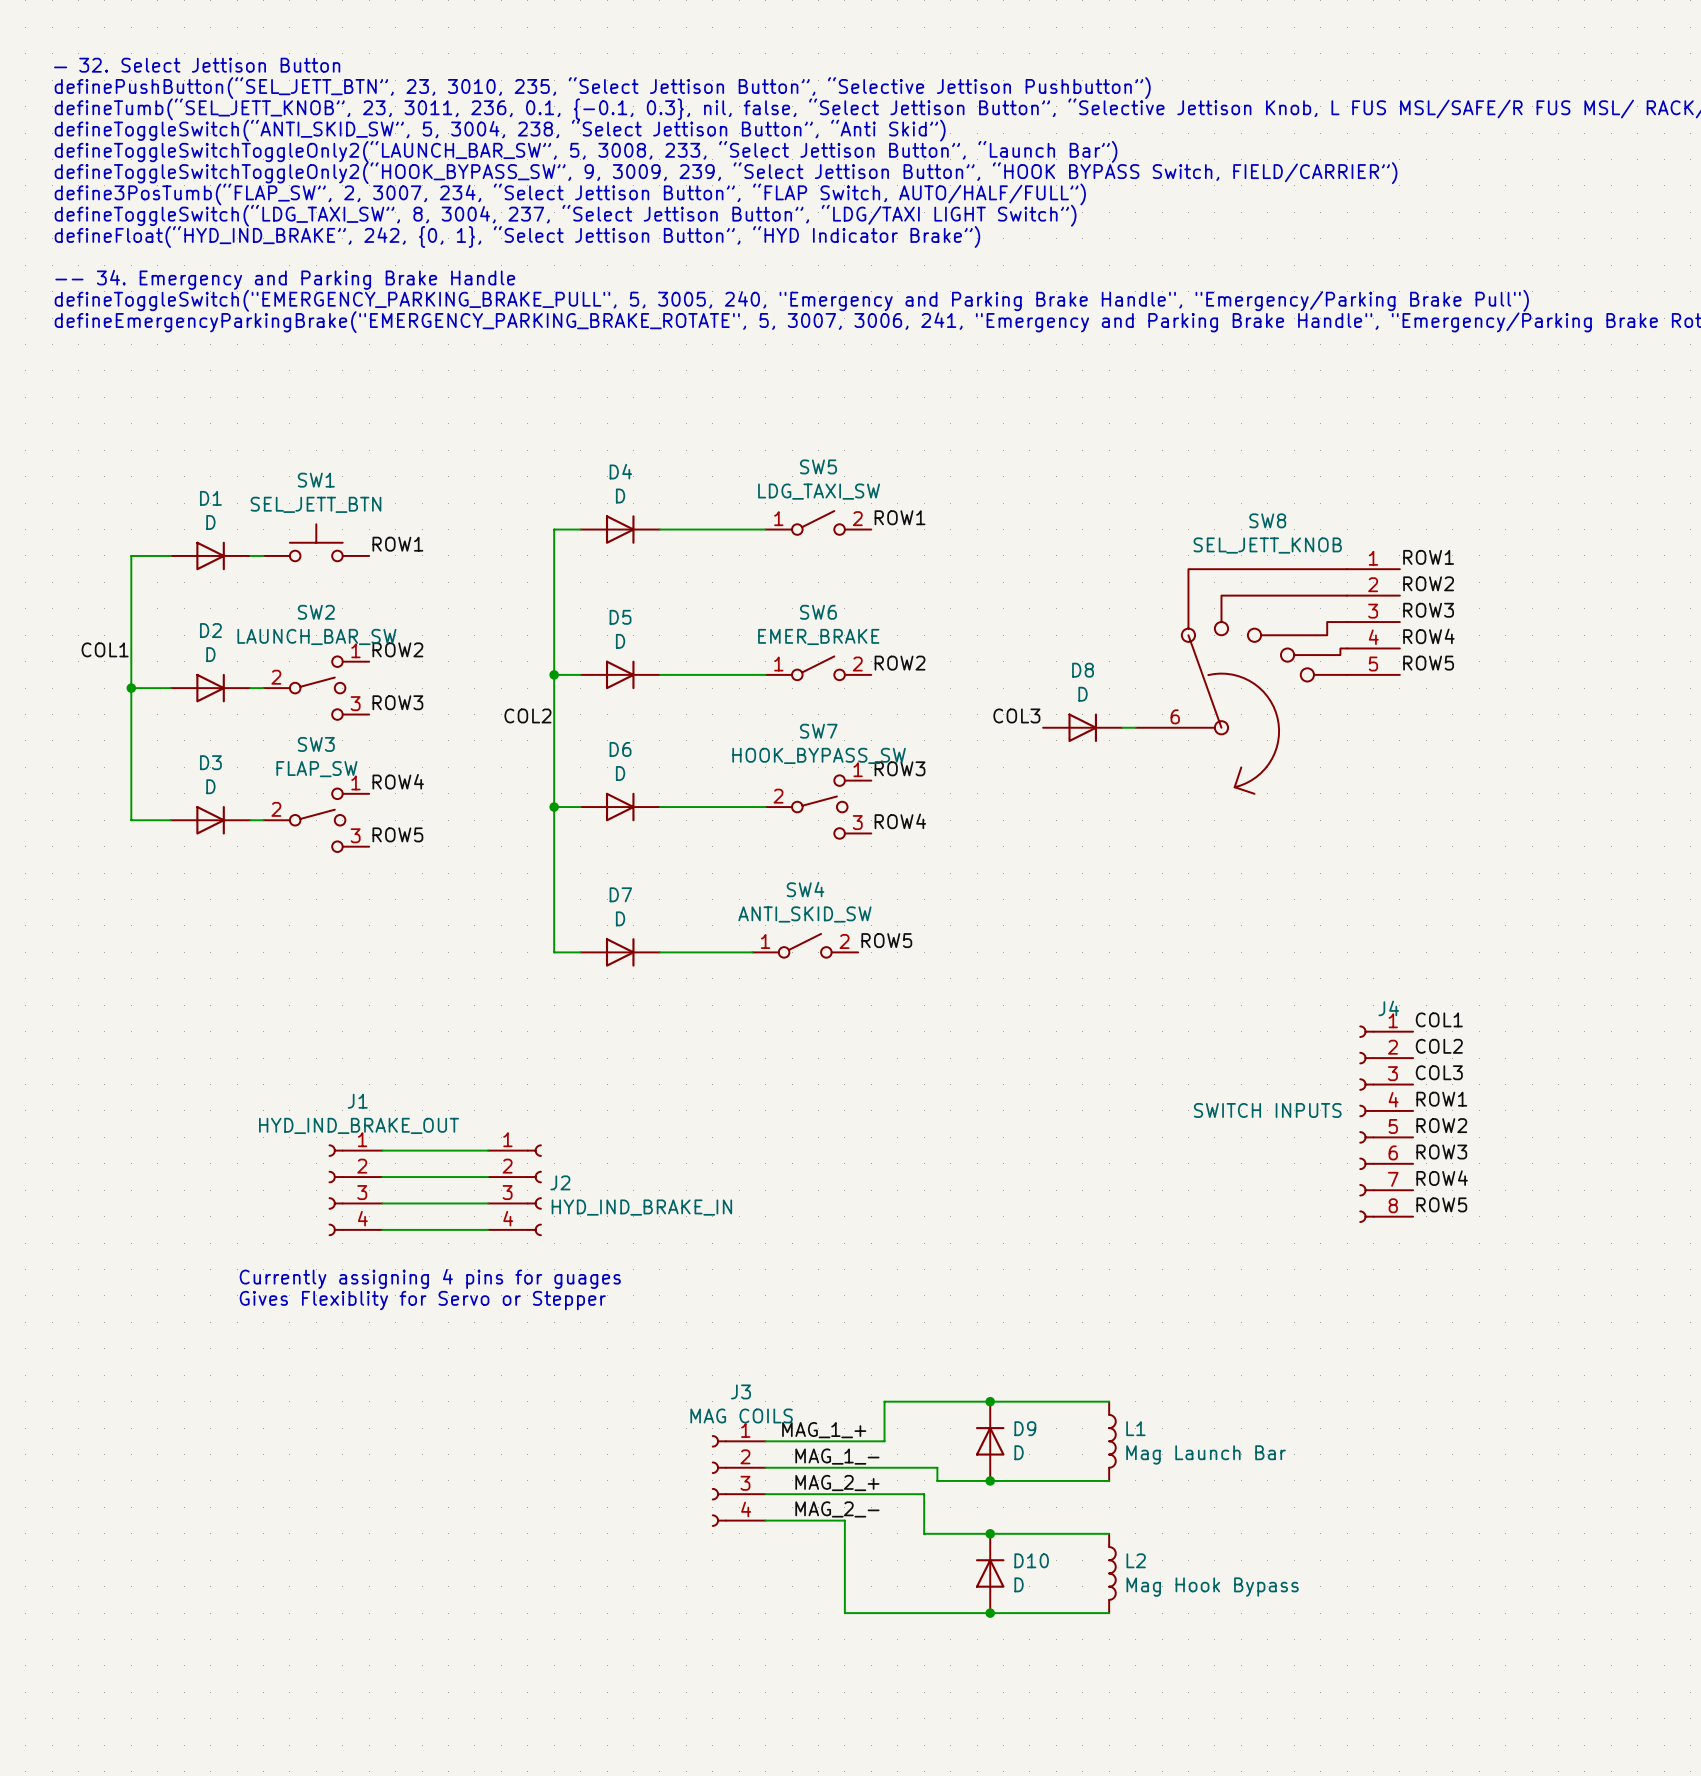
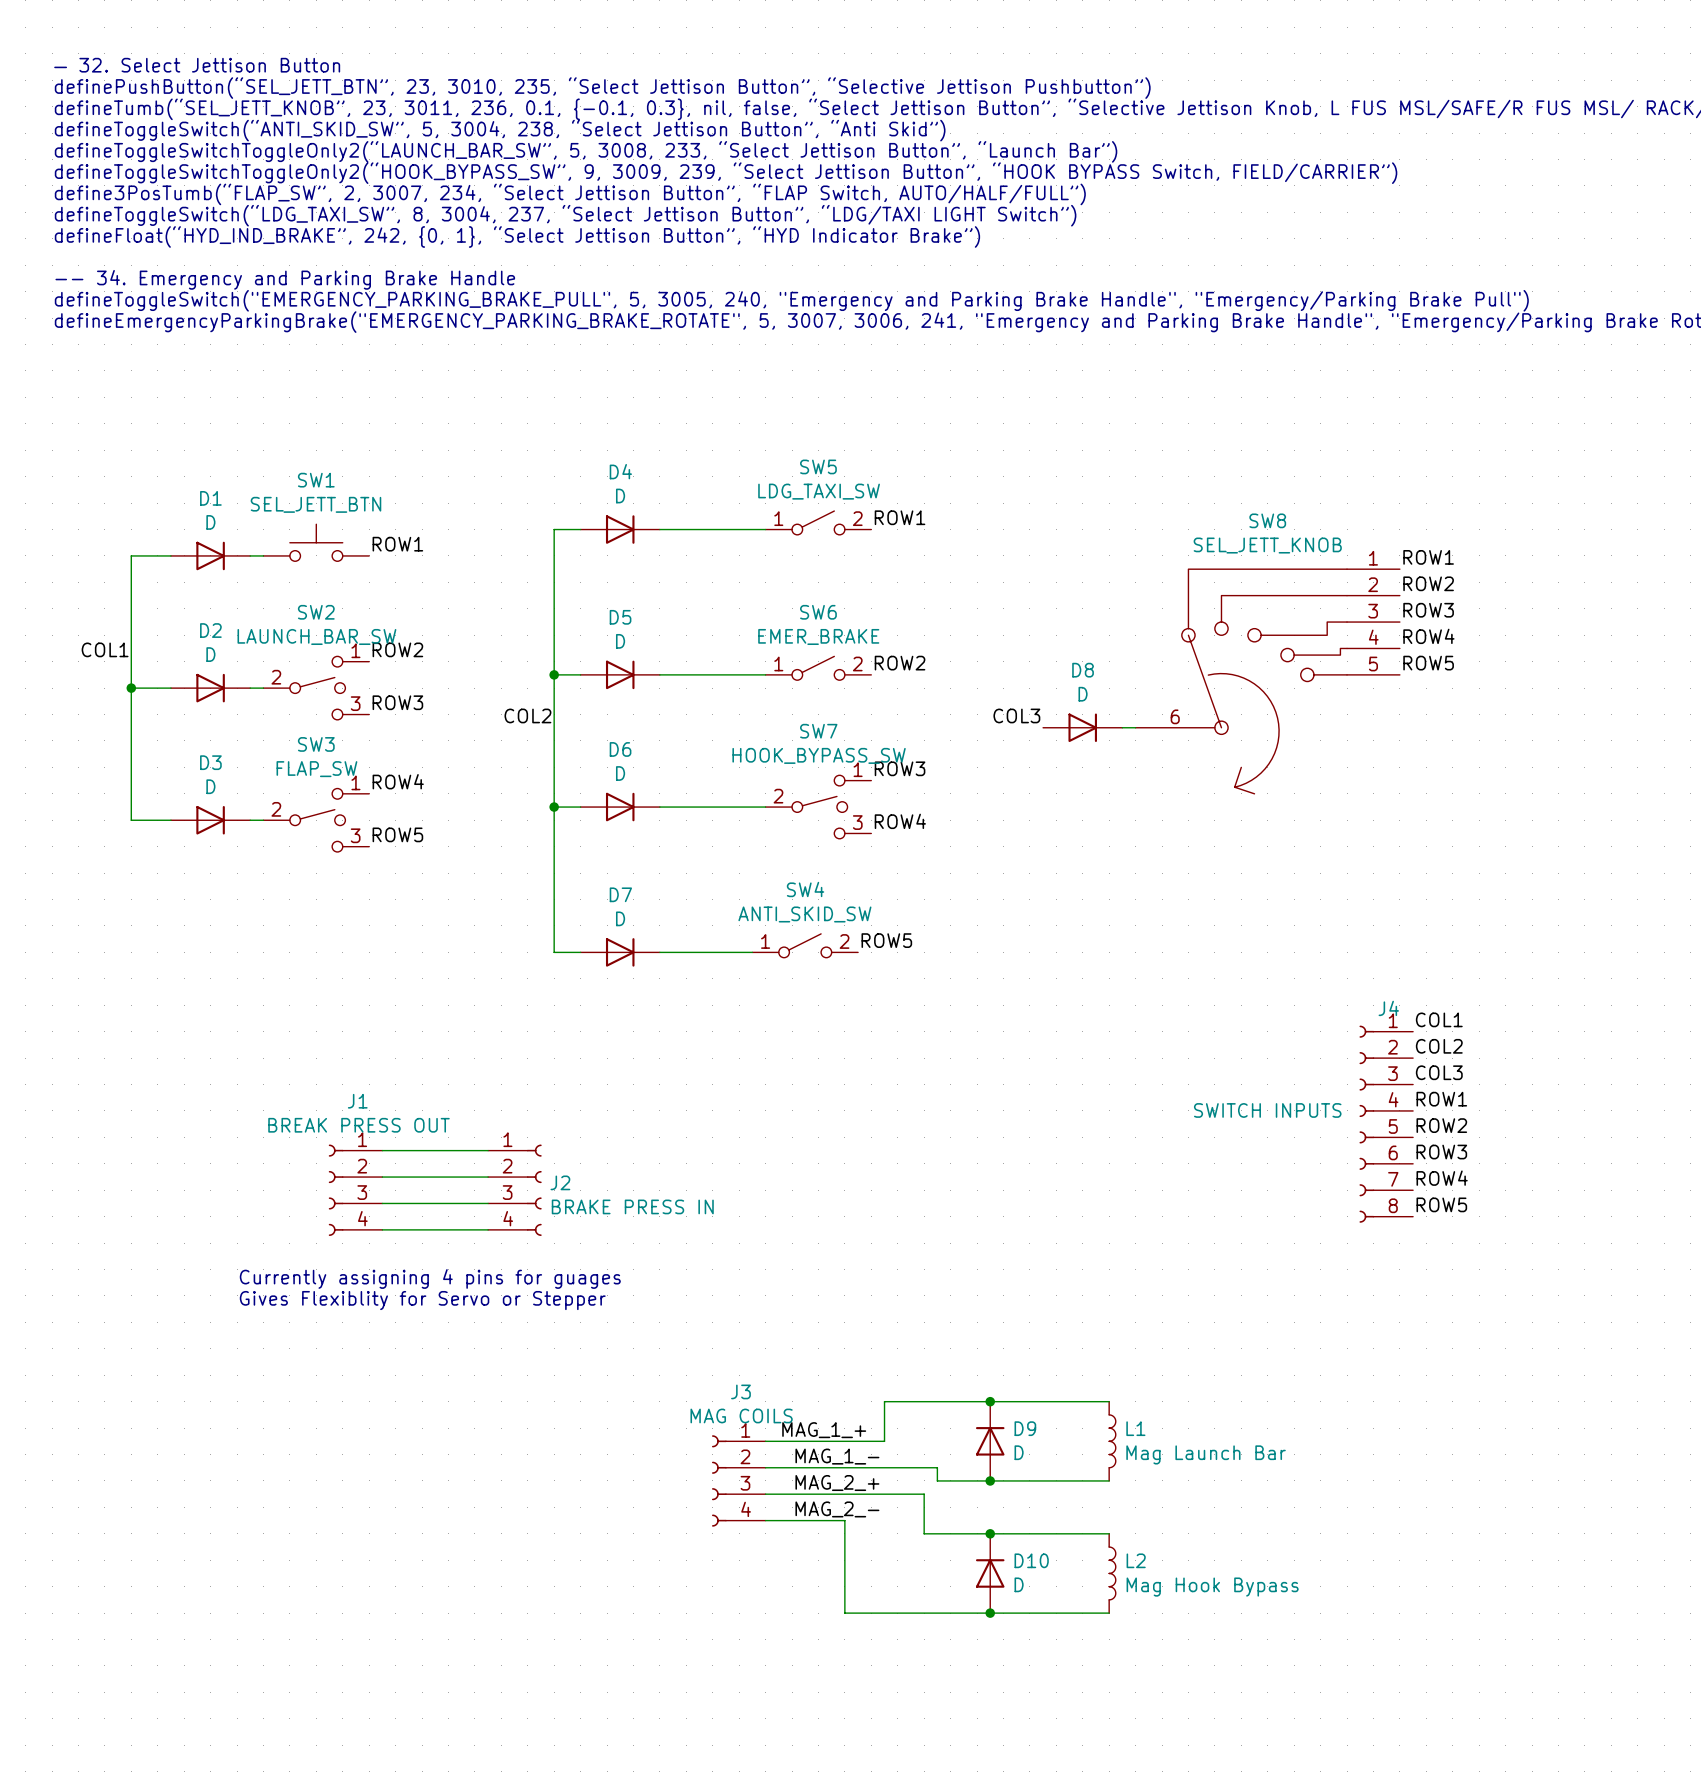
J1 value: HYD_IND_BRAKE_OUT (359, 1125) -> BREAK PRESS OUT (359, 1125)
J2 value: HYD_IND_BRAKE_IN (641, 1207) -> BRAKE PRESS IN (632, 1206)

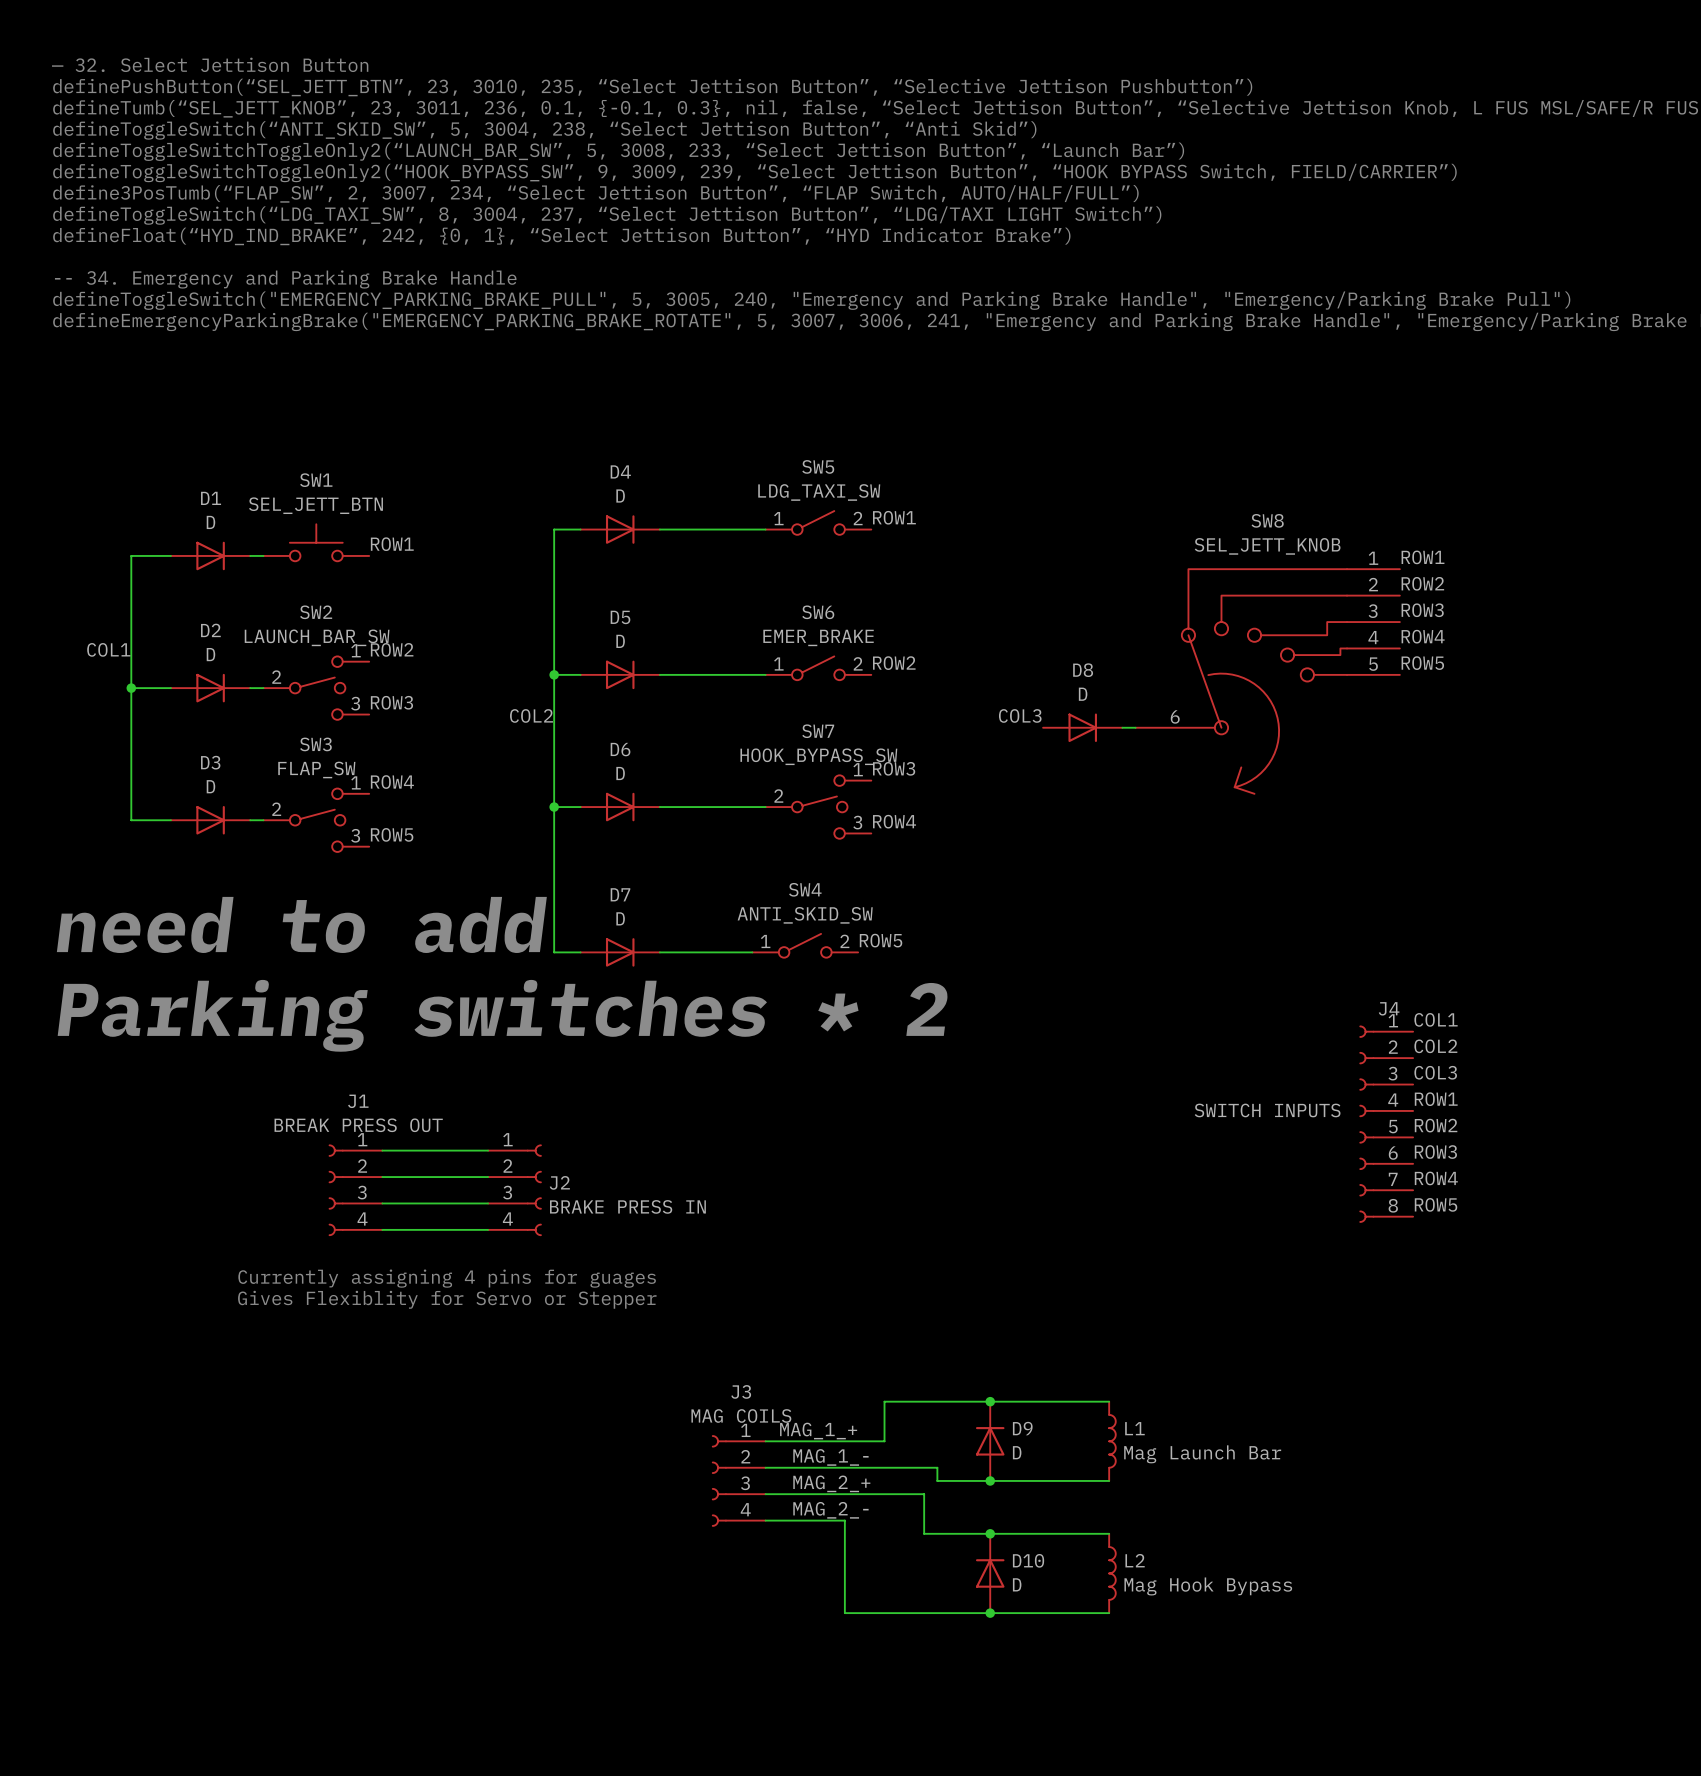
text: none -> need to add (301, 924)
text: none -> Parking switches * 2 (502, 1015)

